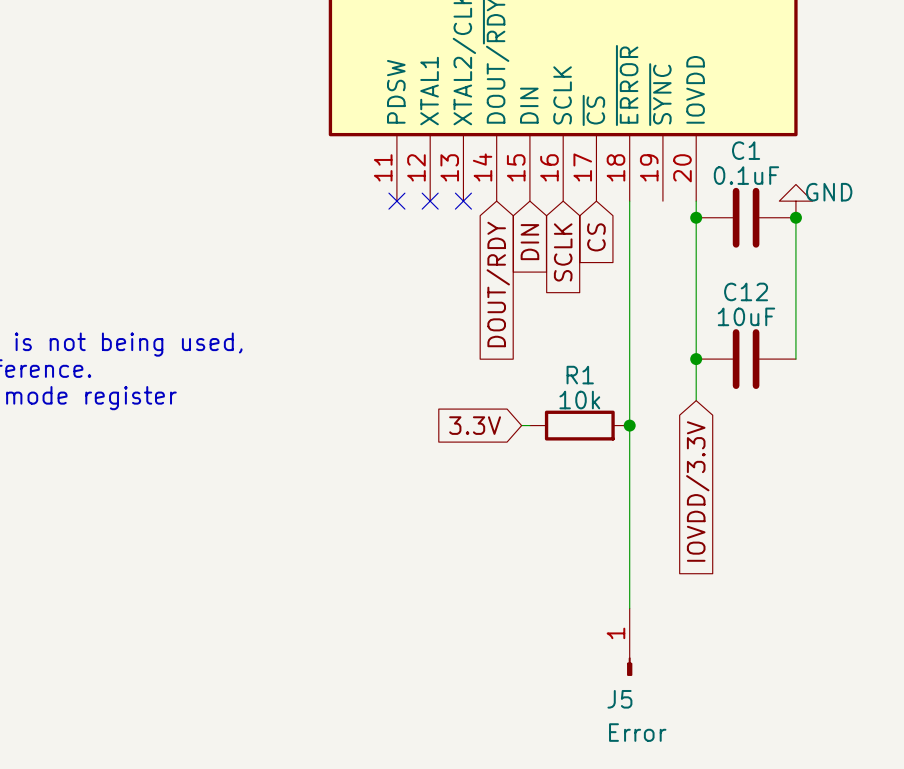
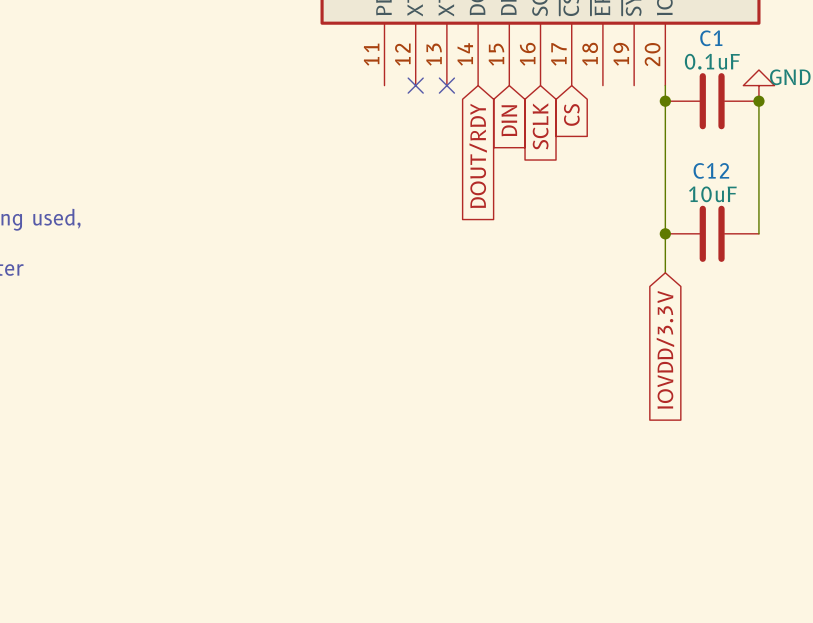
no-connect mark: (396, 201) -> none
wire: (629, 201) (629, 608) -> none
global label: 3.3V (475, 425) -> none
wire: (521, 425) (529, 425) -> none
R1: 10k (579, 425) -> none
junction: (629, 425) -> none
J5: Error (629, 642) -> none

